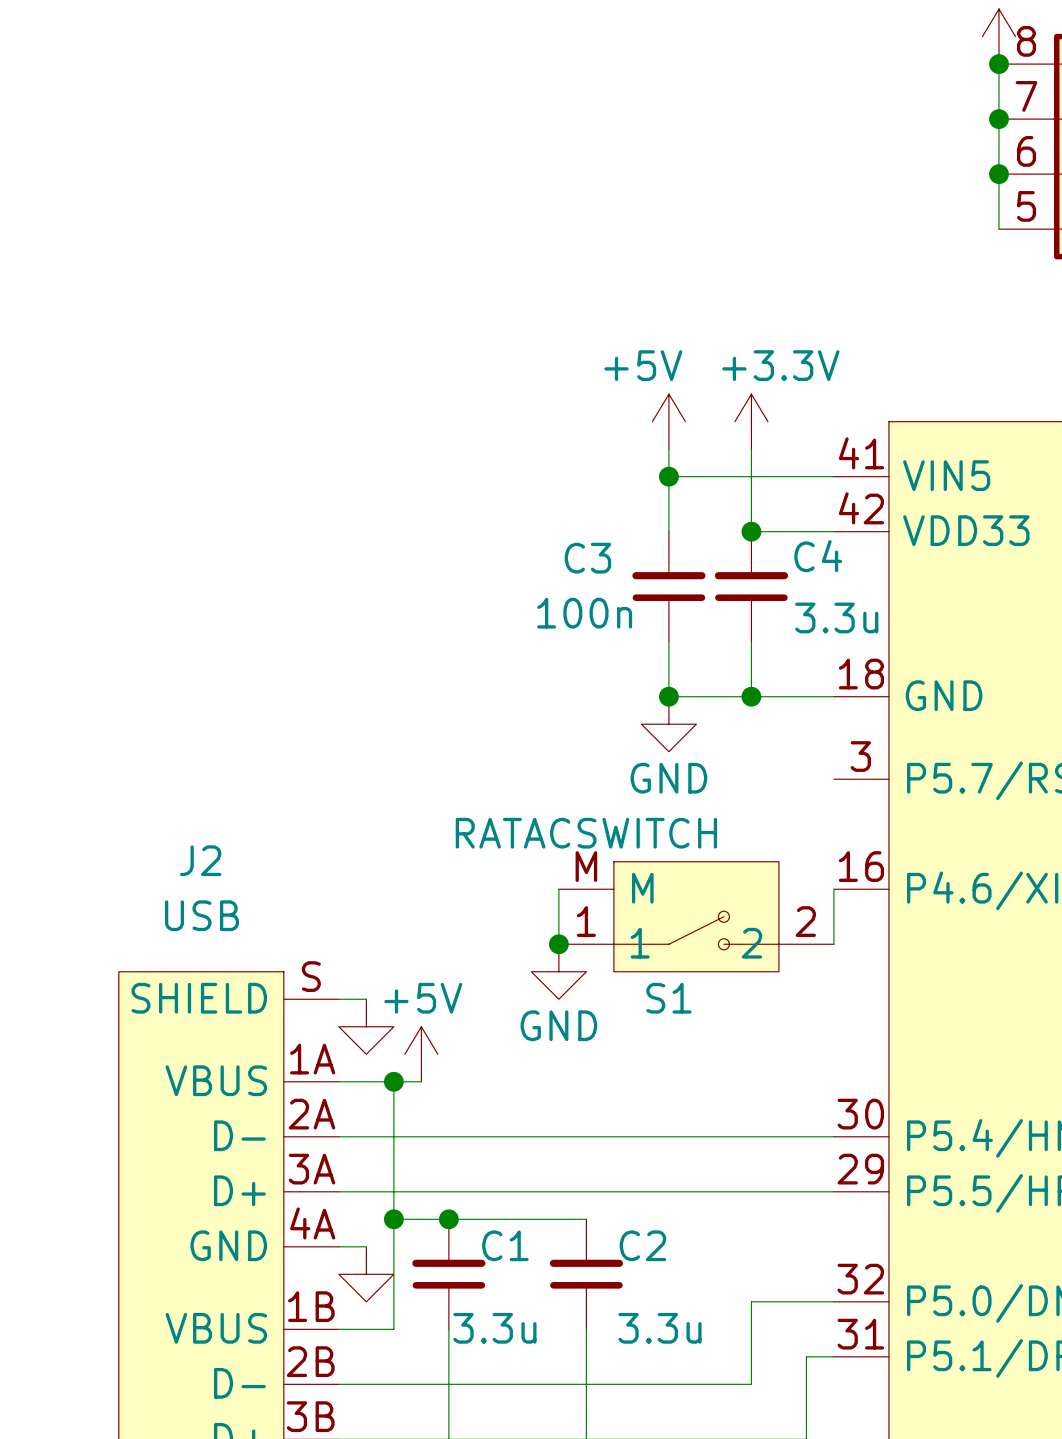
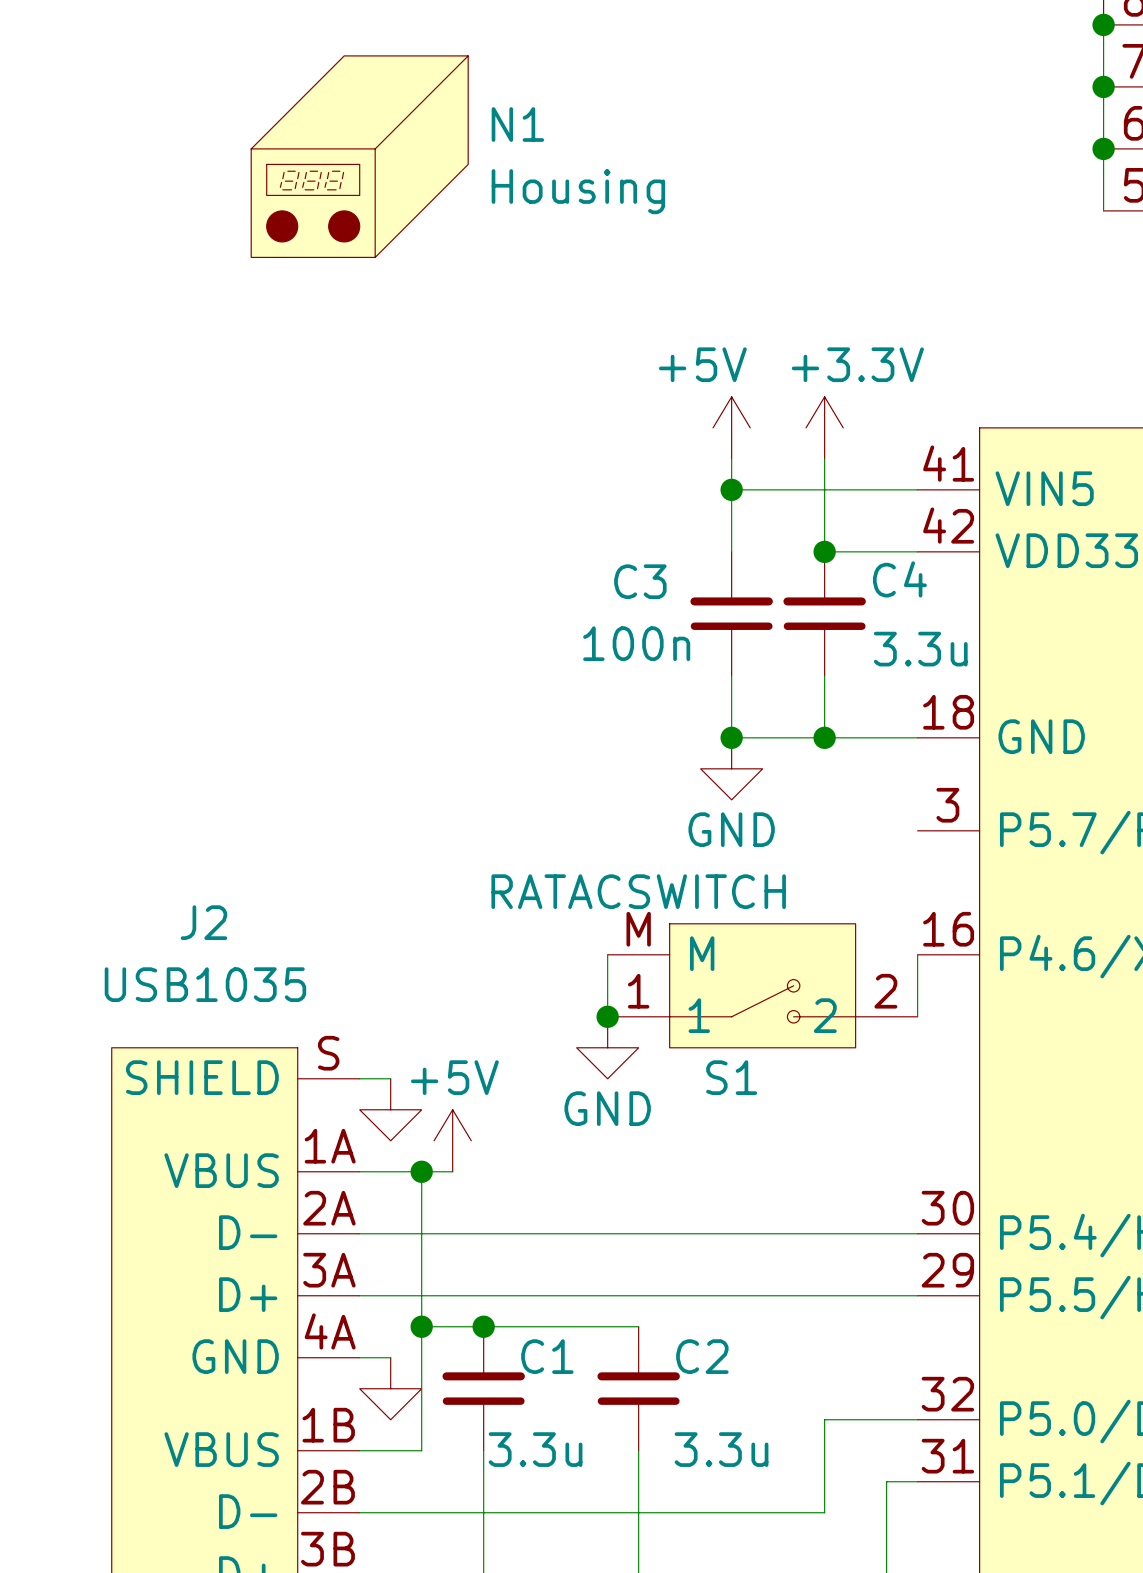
N1: none -> Housing (359, 156)
J2 value: USB (201, 915) -> USB1035 (205, 984)

